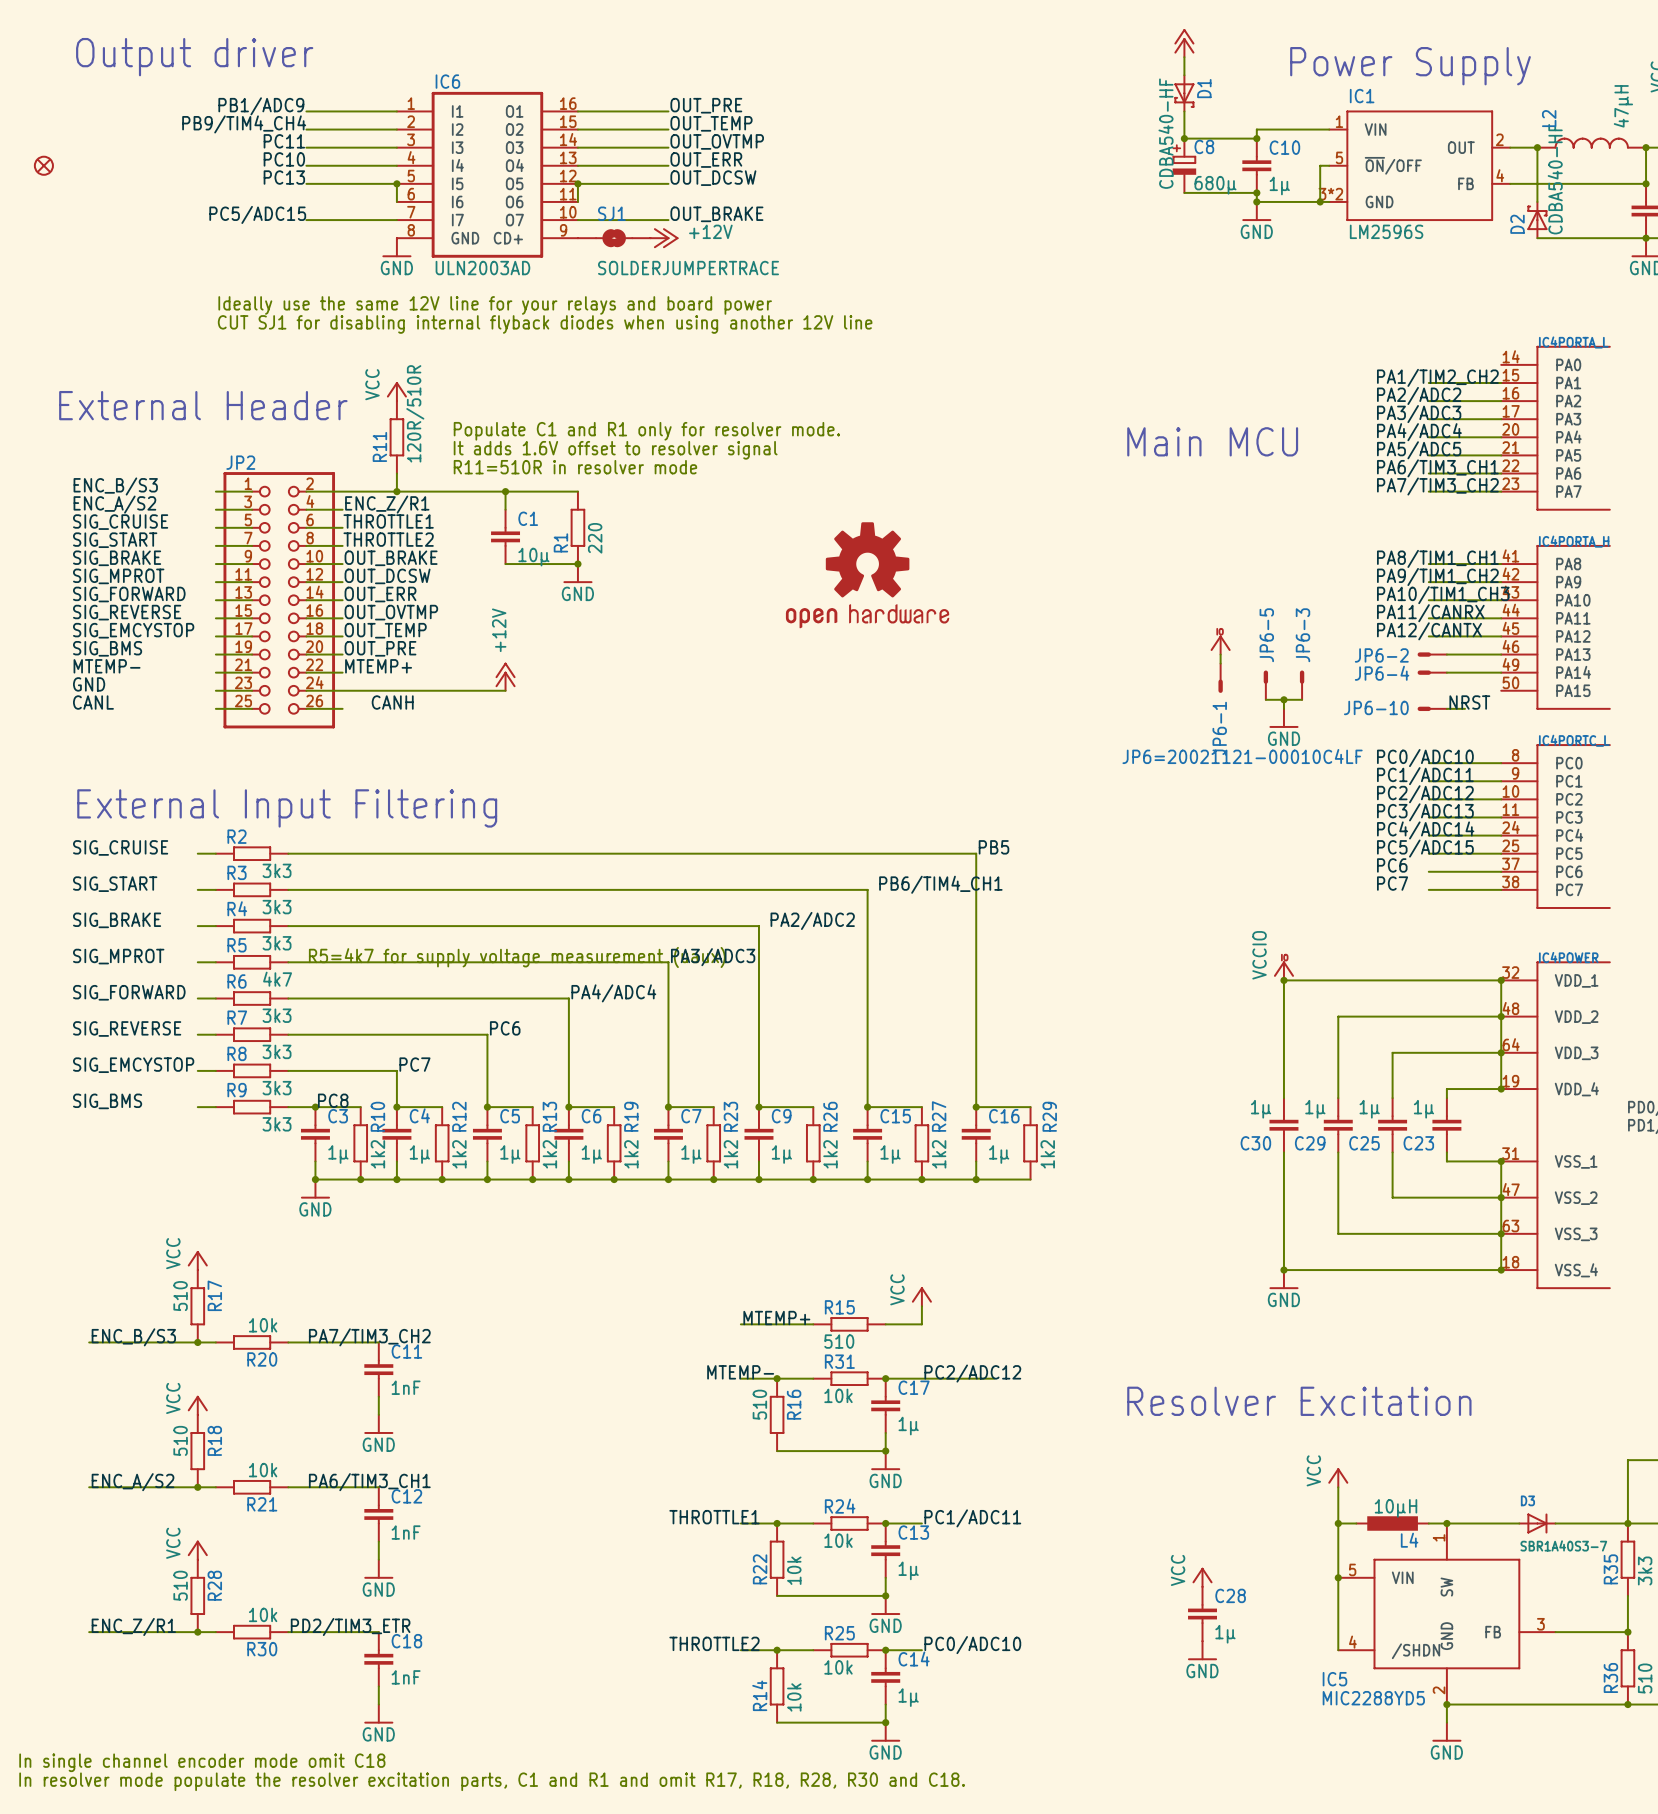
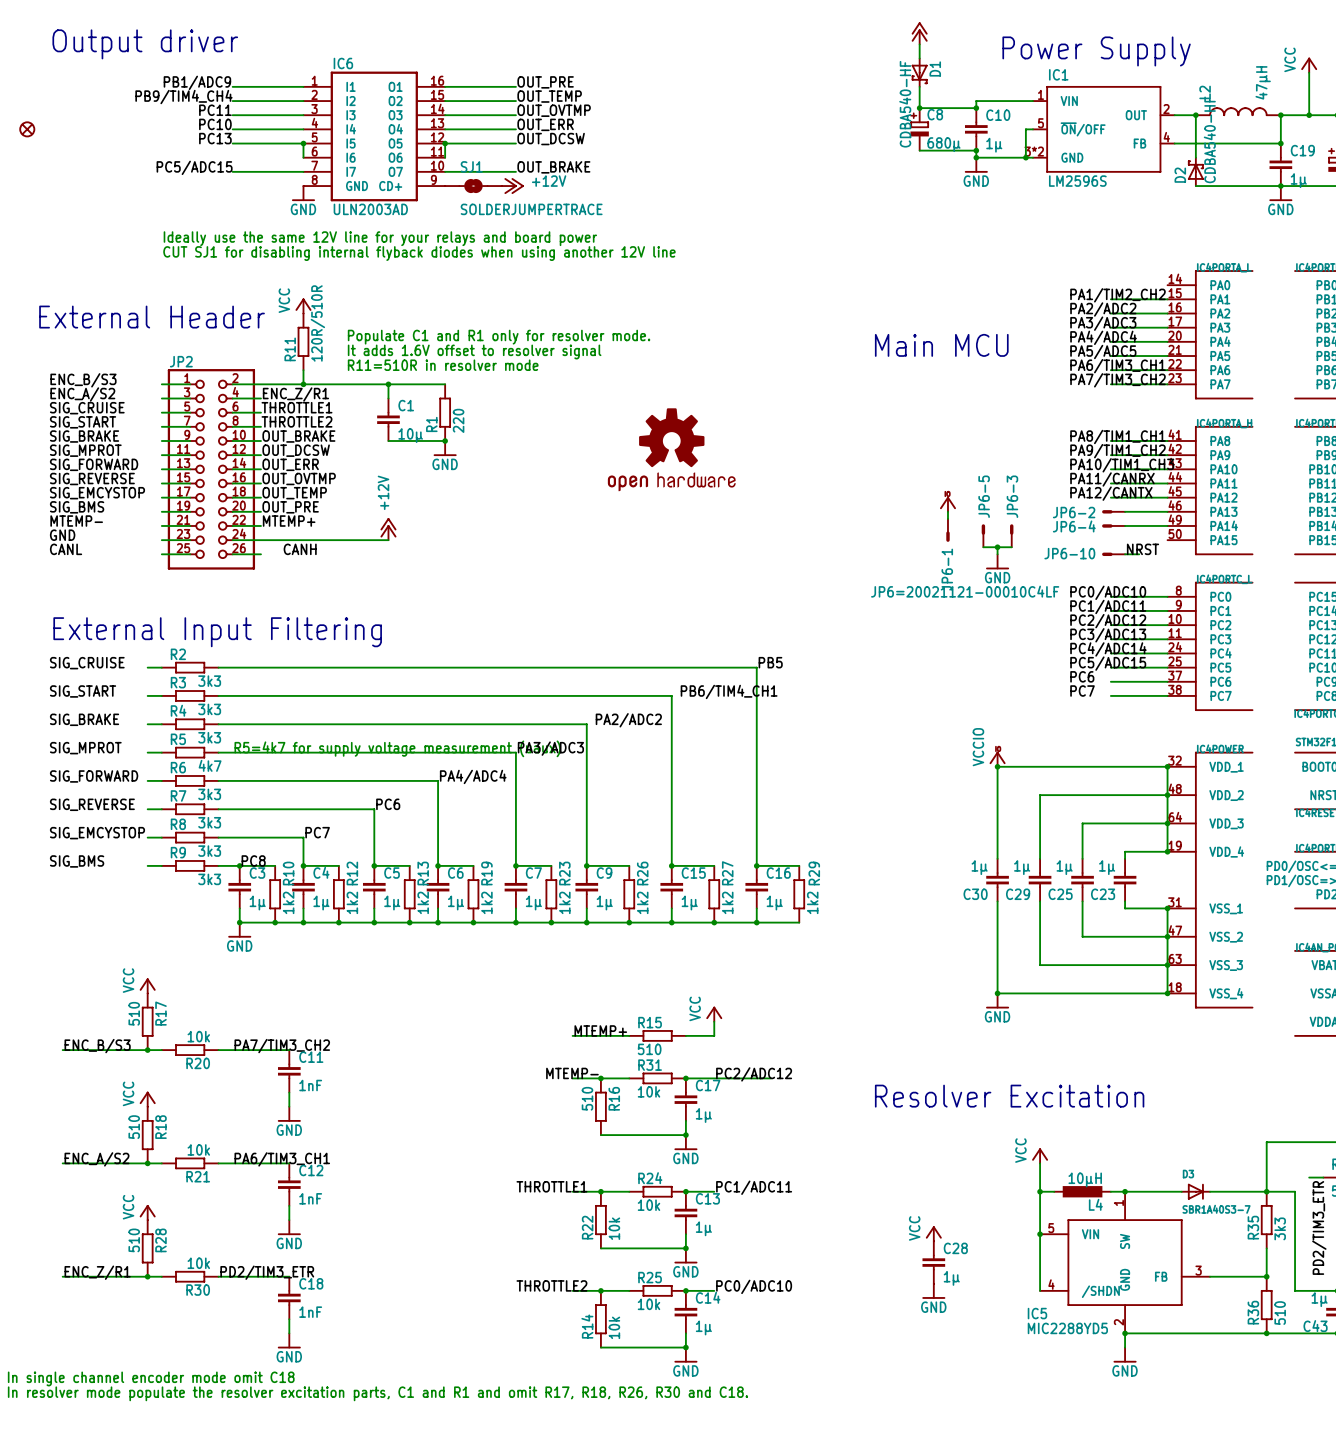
text: In resolver mode populate the resolver excitation parts, C1 and R1 and omit R17, R18, R28, R30 and C18. (492, 1781) -> In resolver mode populate the resolver excitation parts, C1 and R1 and omit R17, R18, R26, R30 and C18. (377, 1393)

